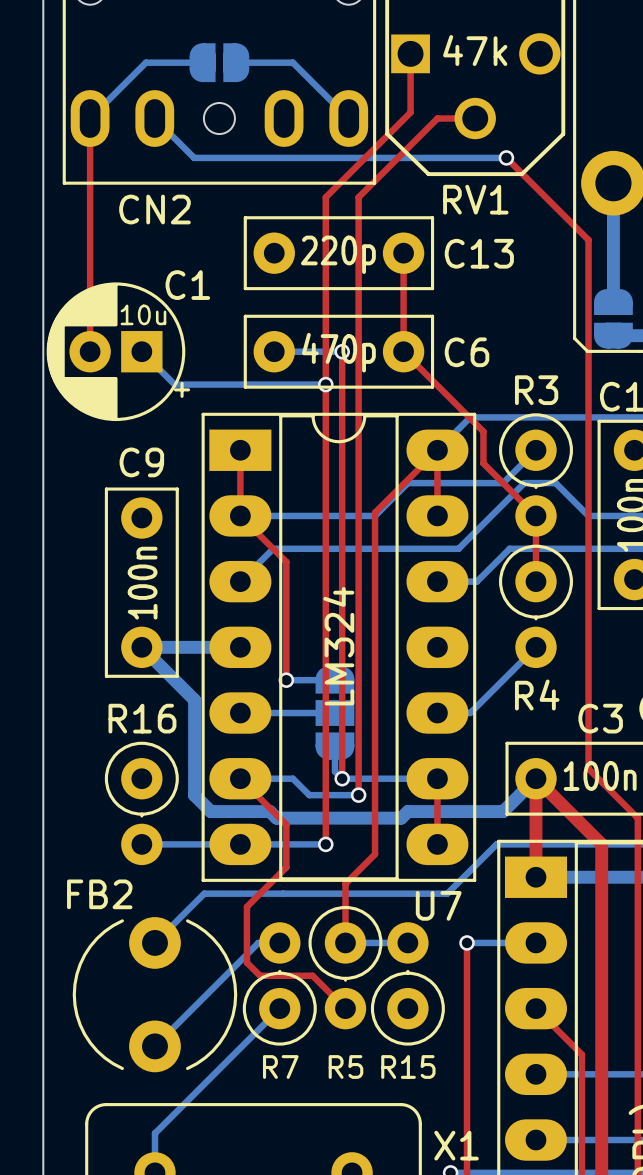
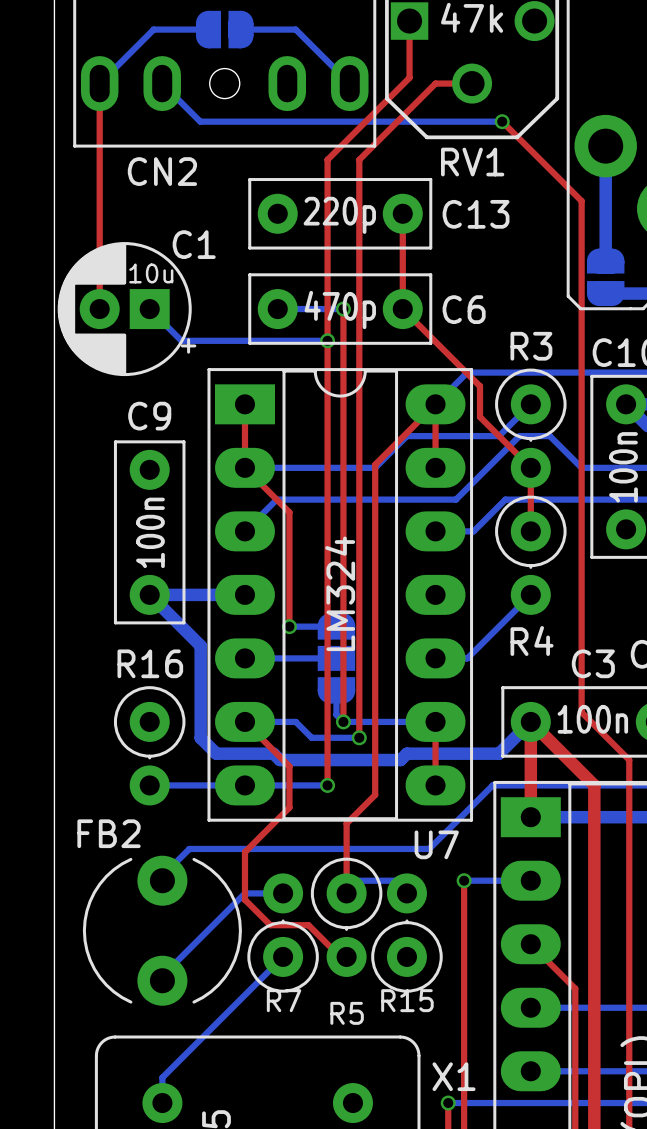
bottom track: (447, 893) (204, 893) (154, 942) -> (445, 833) (429, 848) (189, 848) (162, 875)
top track: (246, 906) (246, 962) (260, 975) (312, 975) (345, 1008) -> (251, 845) (244, 852) (244, 899) (270, 925) (308, 925) (340, 956)
bottom track: (279, 942) (258, 942) (154, 1046) -> none
bottom track: none -> (283, 893) (244, 893) (162, 975)
R5 position: (345, 967) -> (346, 917)
R7 position: (279, 983) -> (283, 933)
R15 position: (407, 983) -> (406, 933)
bottom track: (279, 1008) (154, 1133) (154, 1146) -> (283, 956) (162, 1077)

